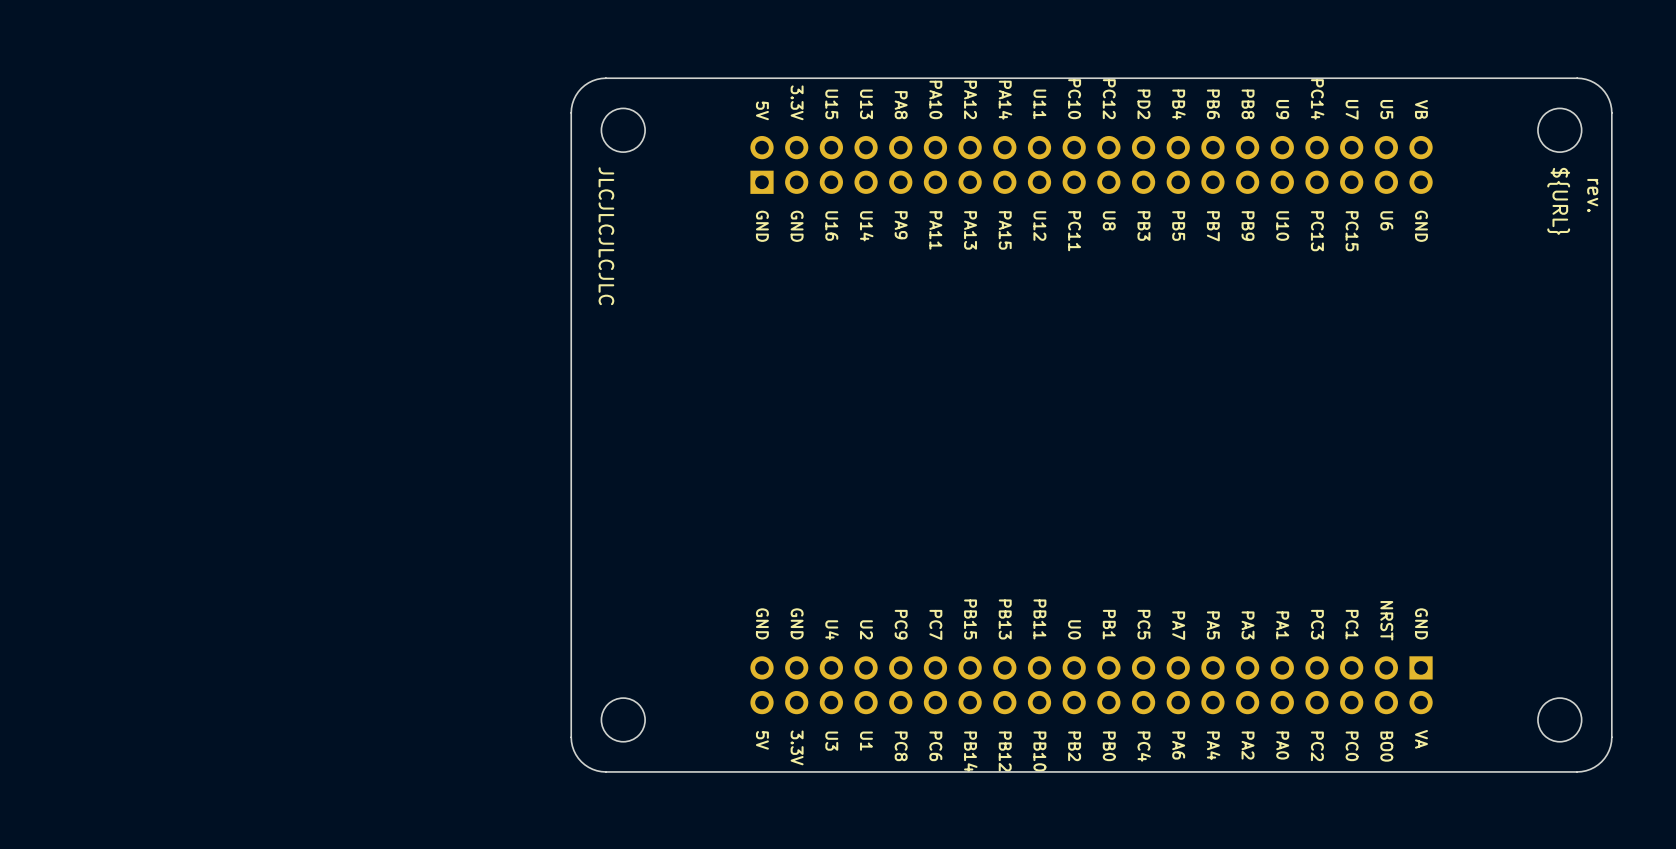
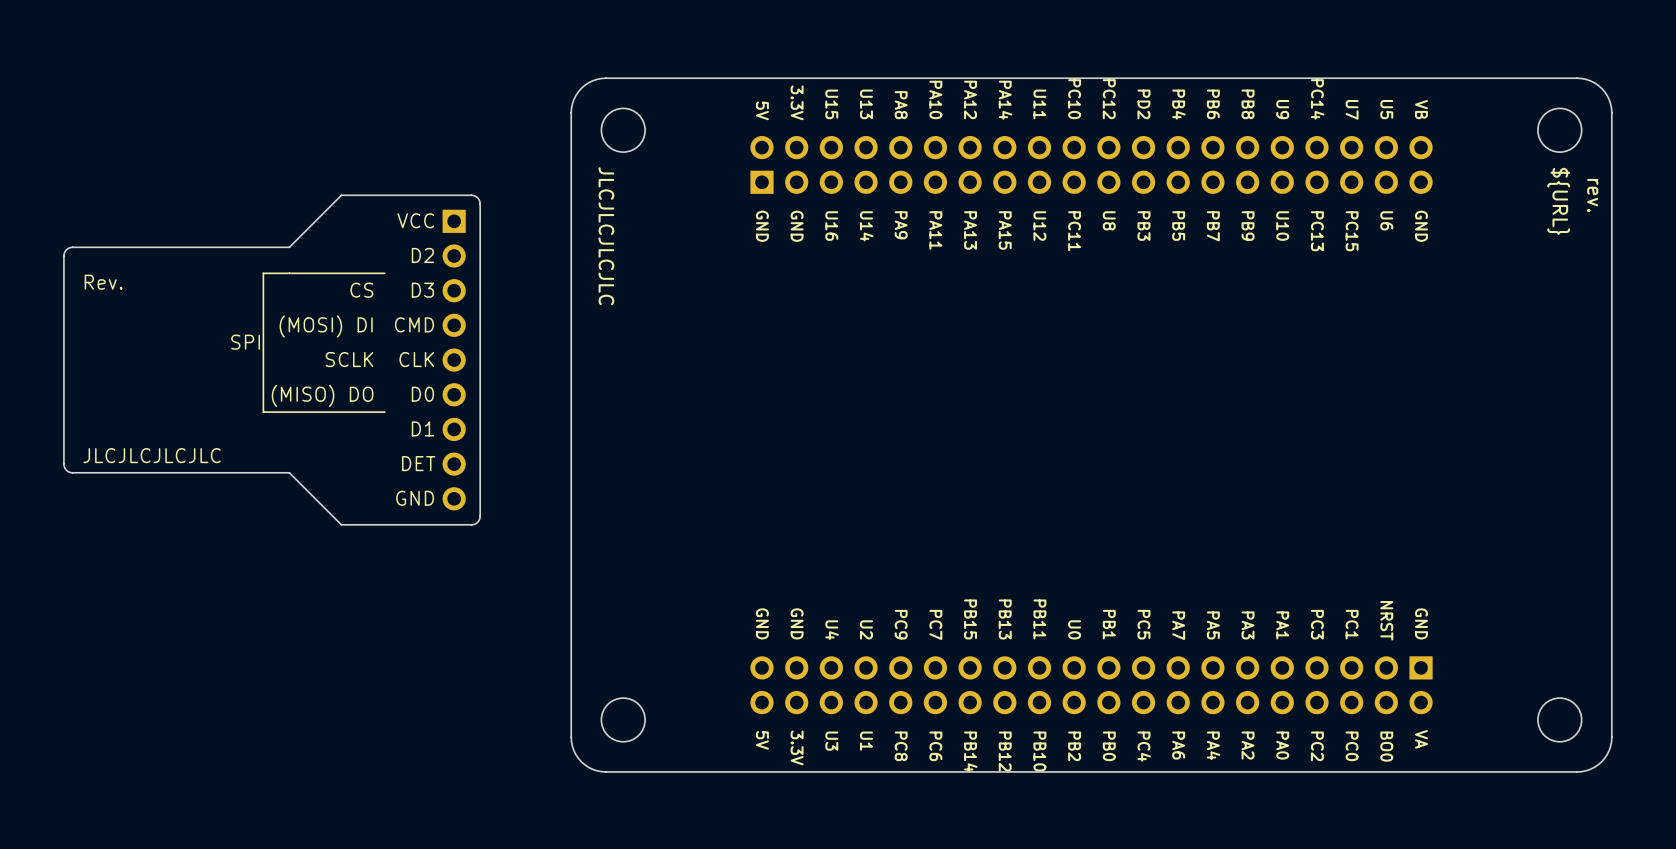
board edge: none -> (471, 195) (341, 195) (289, 247) (67, 248) (63, 255) (65, 468) (72, 472) (289, 472) (341, 524) (476, 523) (480, 516) (480, 203) (477, 197) (471, 195)
text: none -> VCC (415, 220)
text: none -> D2 (422, 255)
line: none -> (384, 273) (263, 273) (263, 412) (384, 412)
text: none -> Rev. (103, 282)
text: none -> CS (361, 290)
text: none -> D3 (422, 290)
text: none -> CMD (414, 324)
text: none -> (MOSI) DI (326, 326)
text: none -> SPI (245, 342)
text: none -> SCLK (349, 359)
text: none -> CLK (416, 359)
part: none -> (454, 360)
text: none -> D0 (422, 394)
text: none -> (MISO) DO (322, 395)
text: none -> D1 (422, 428)
text: none -> JLCJLCJLCJLC (152, 455)
text: none -> DET (418, 463)
text: none -> GND (415, 498)

